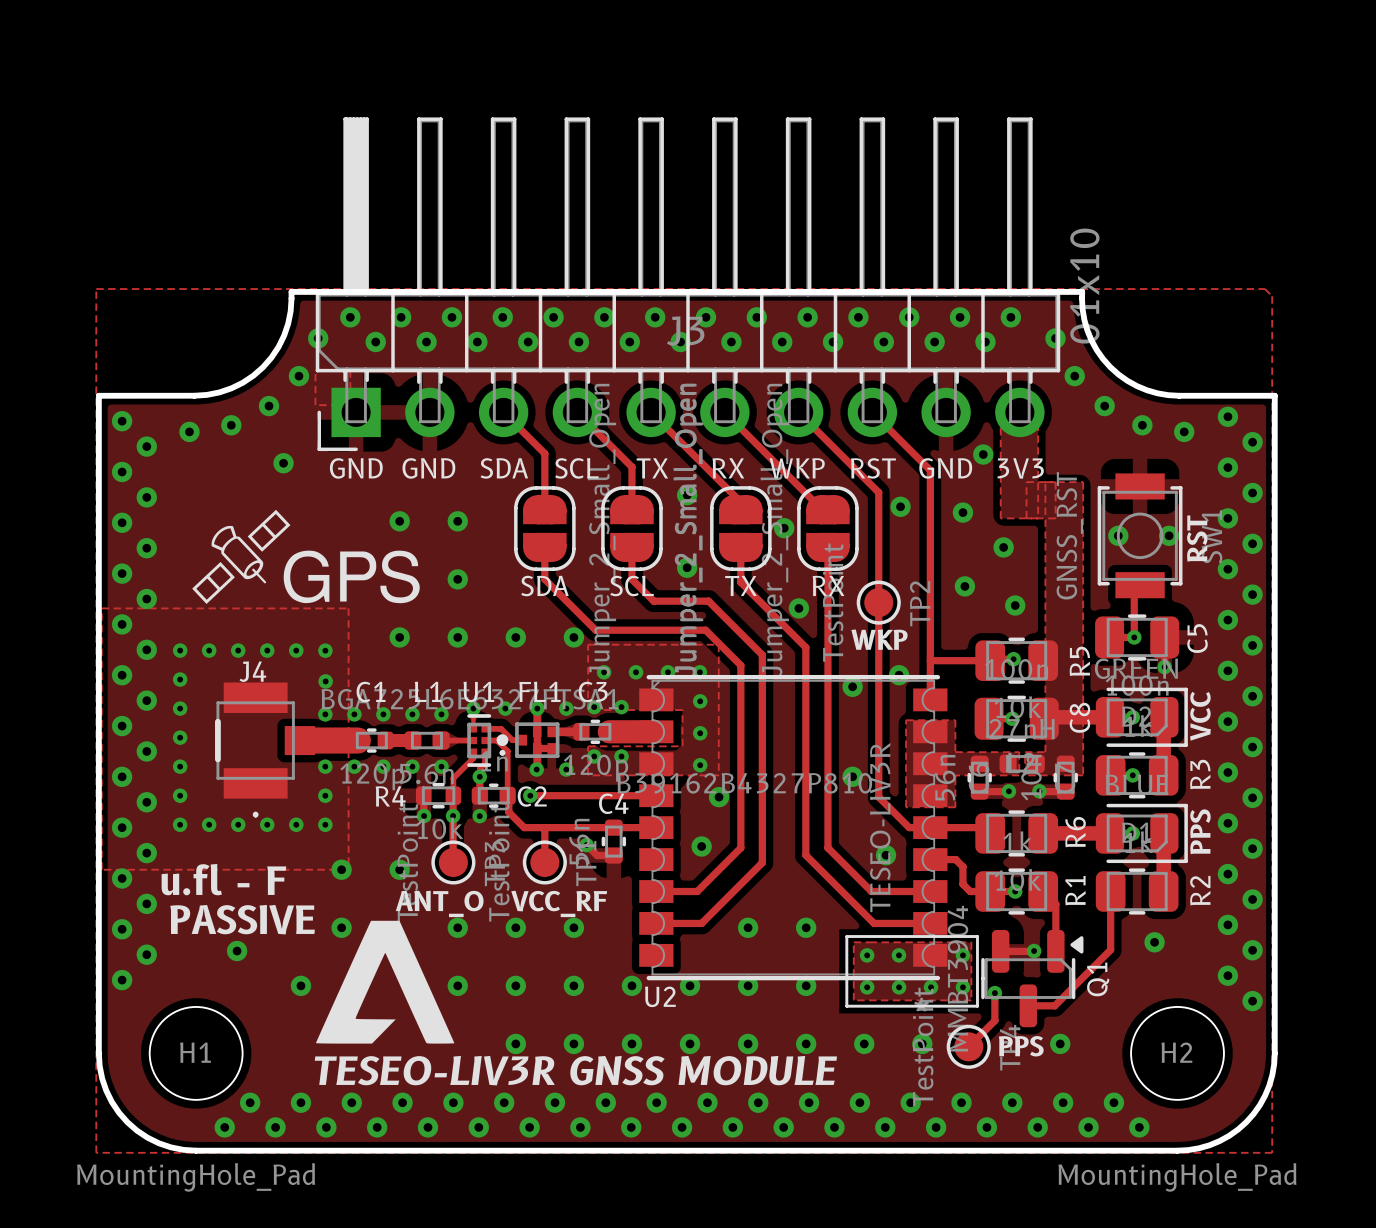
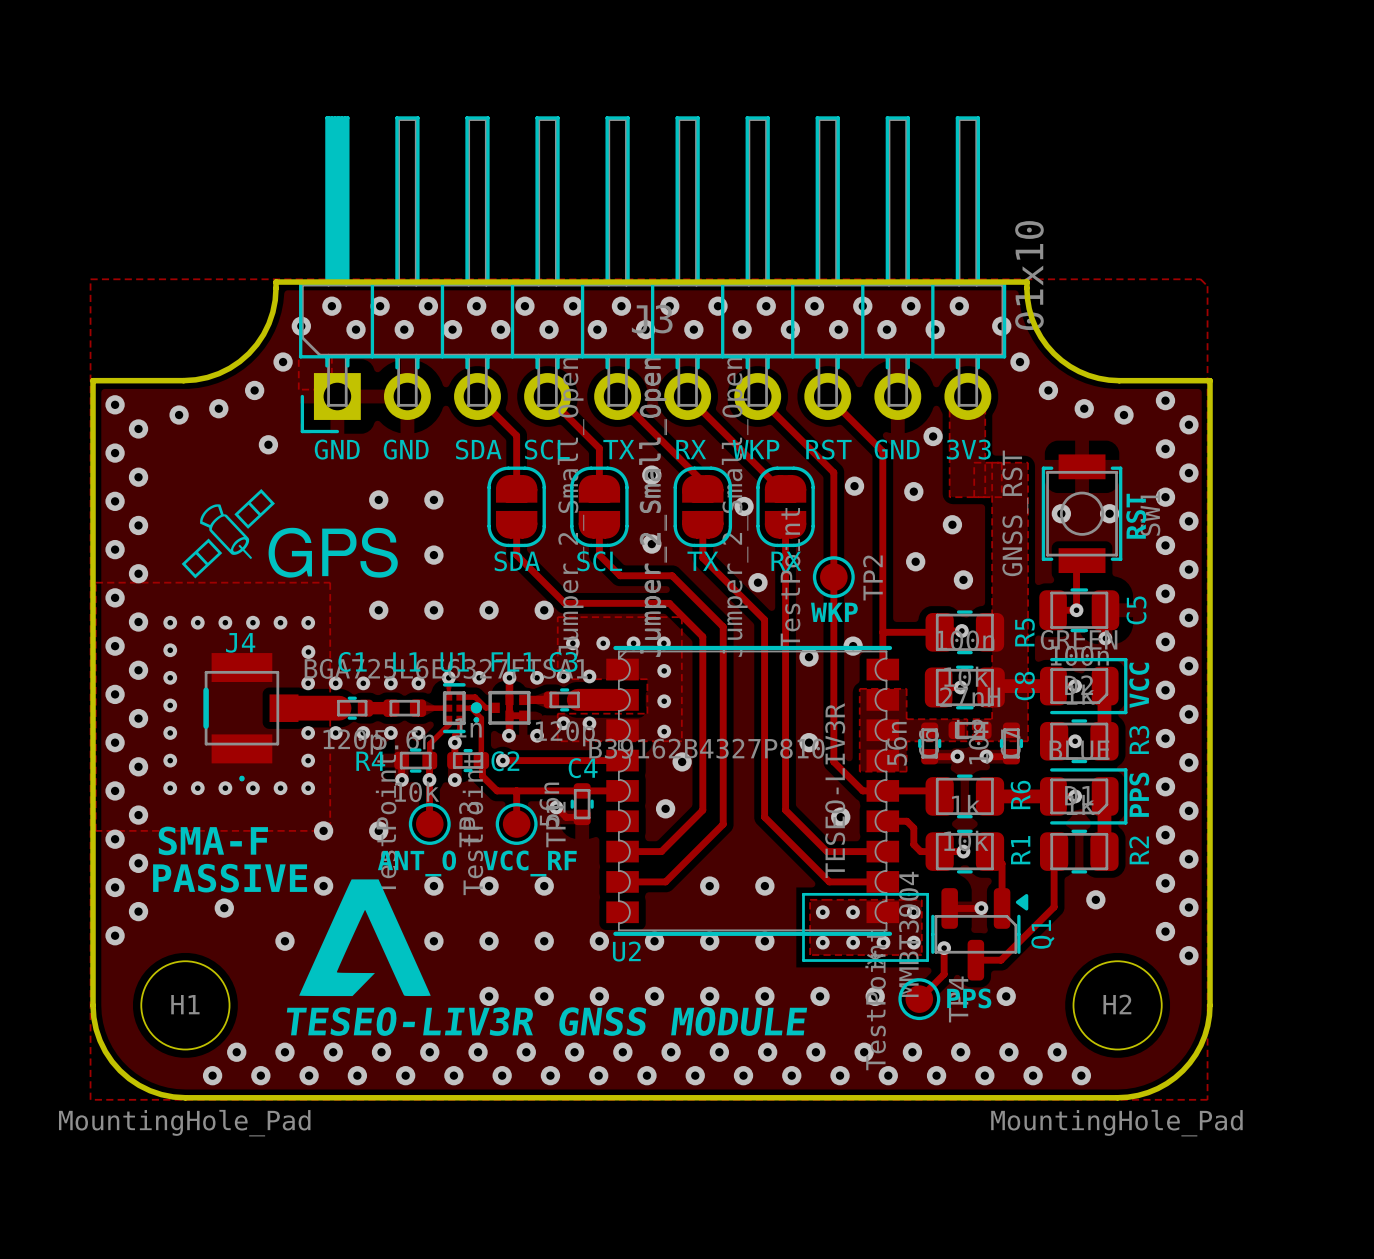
text: u.fl - F (223, 879) -> SMA-F (213, 840)

